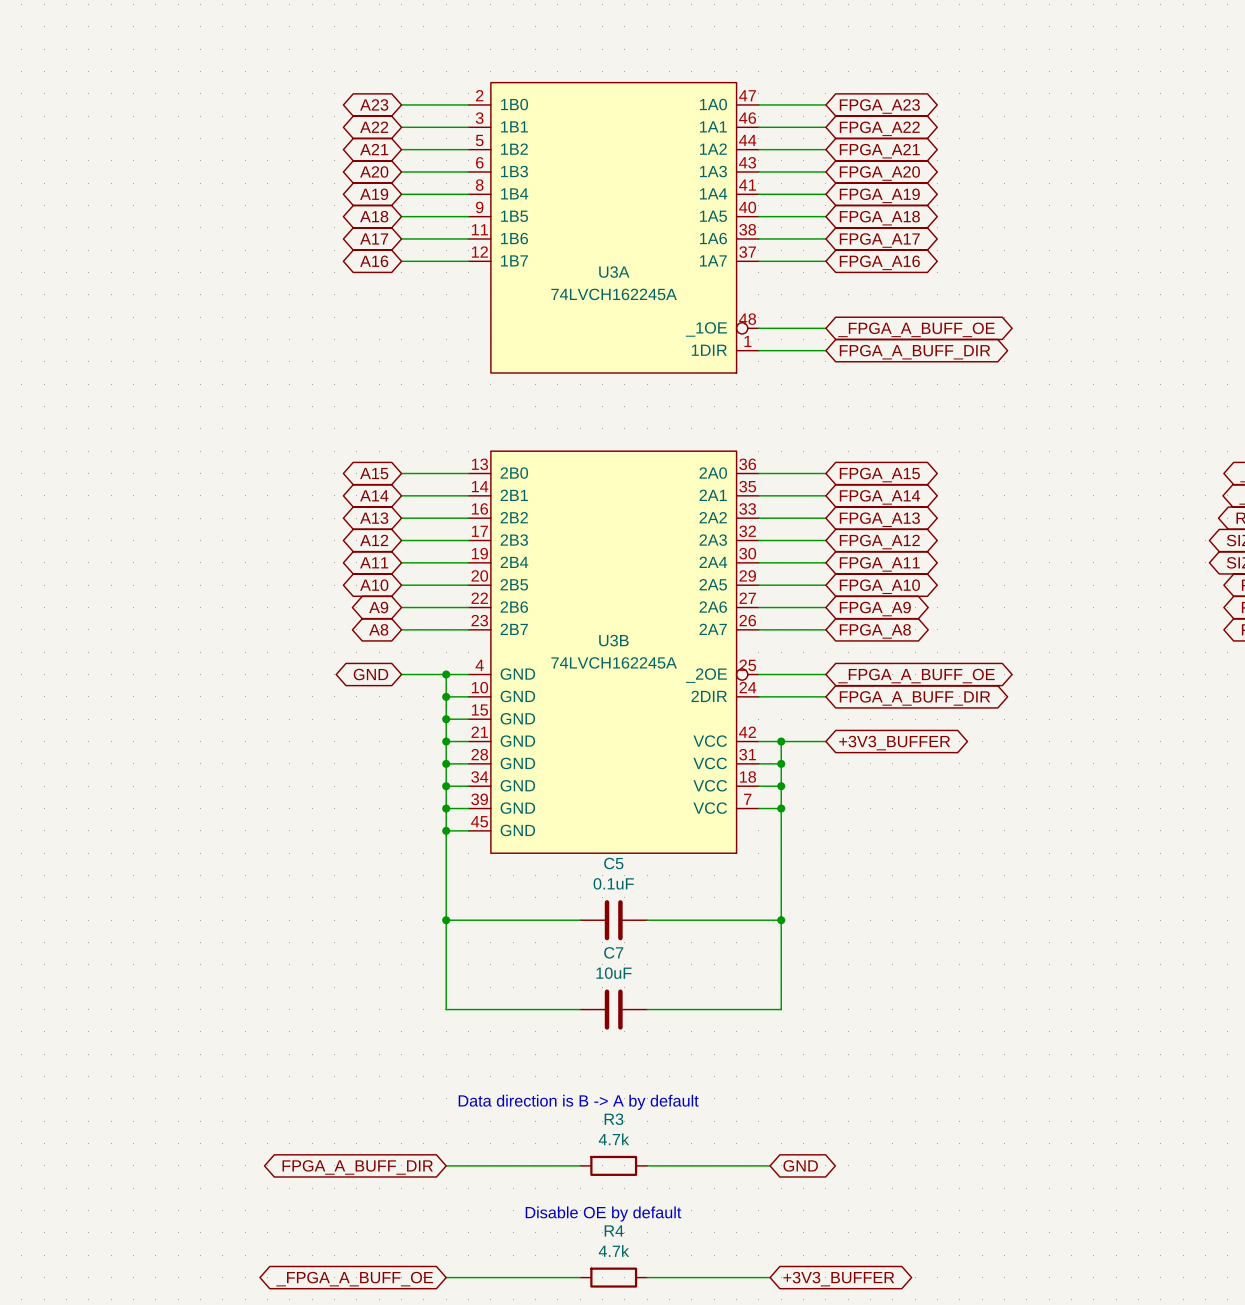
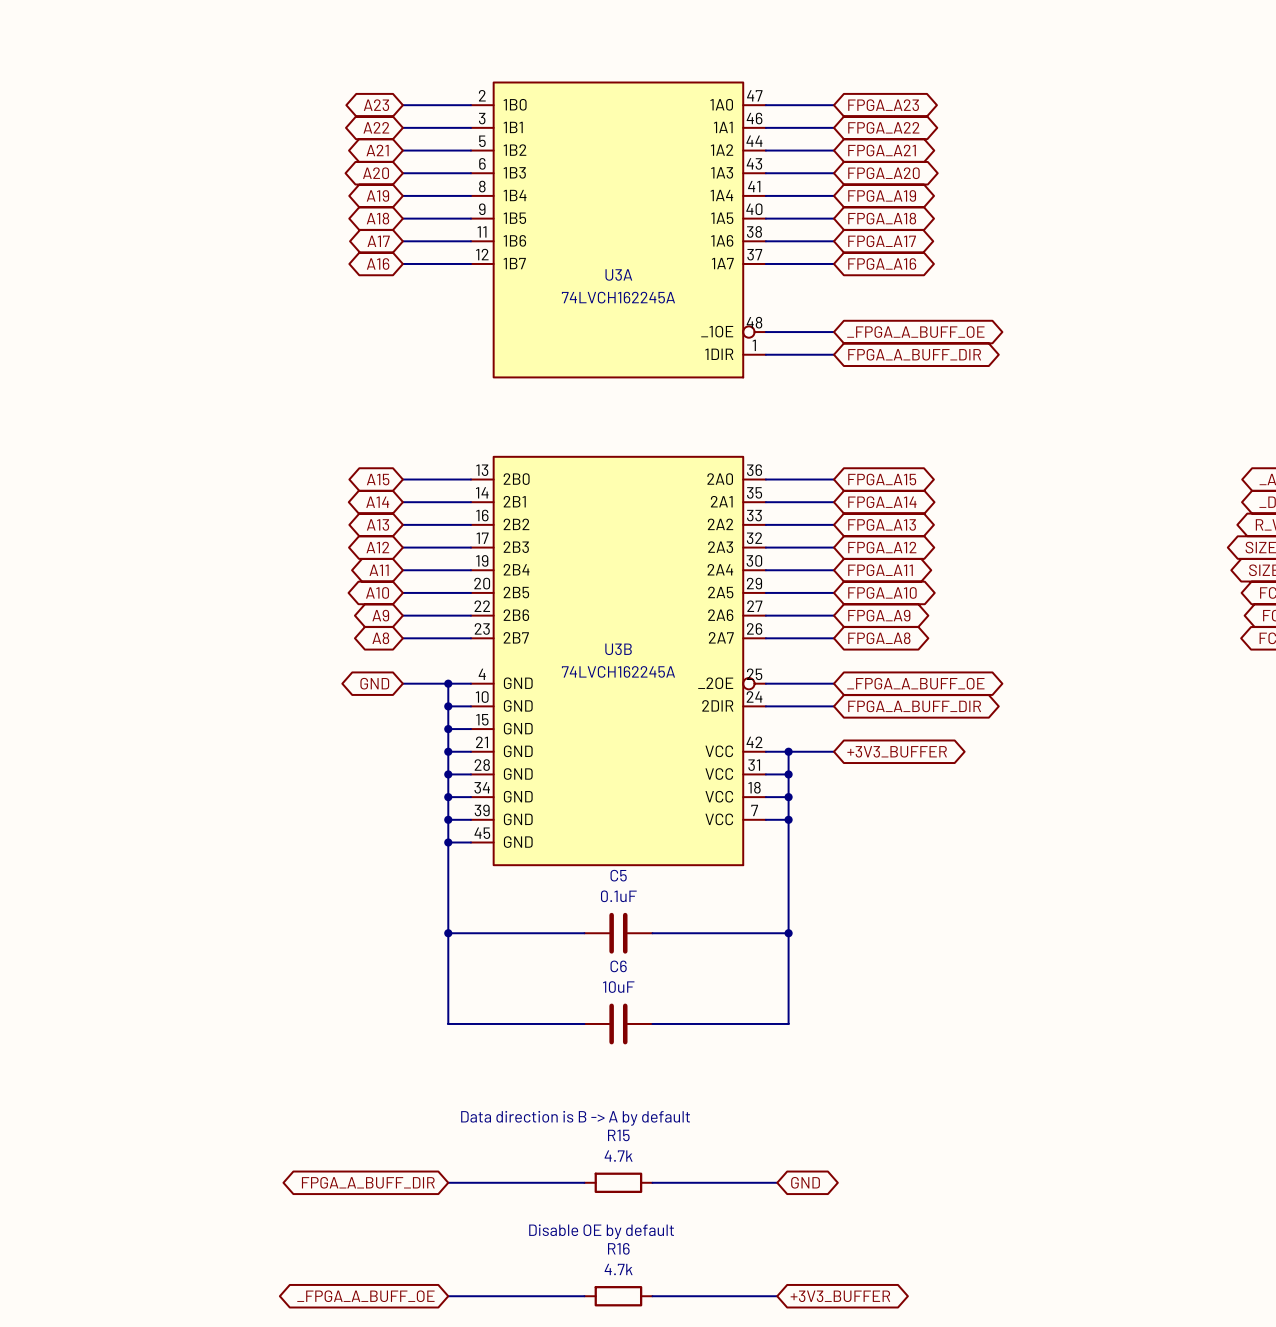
C7 name: C7 (613, 952) -> C6 (618, 966)
R3 name: R3 (614, 1119) -> R15 (618, 1135)
R4 name: R4 (614, 1230) -> R16 (618, 1248)

